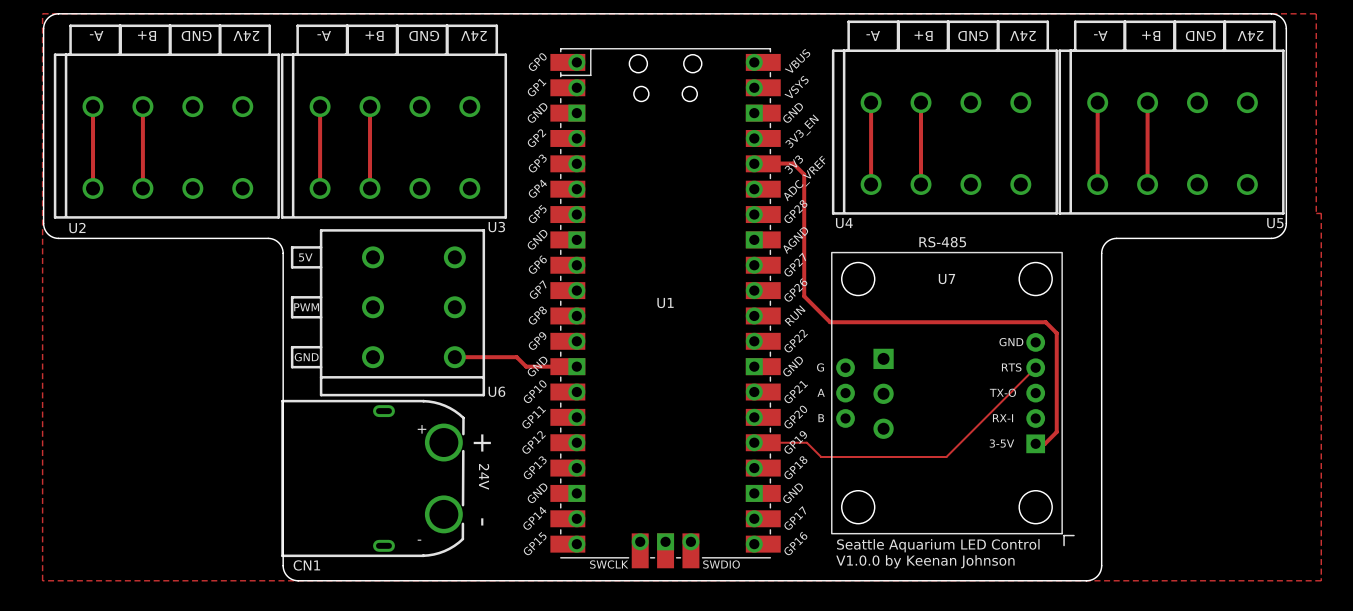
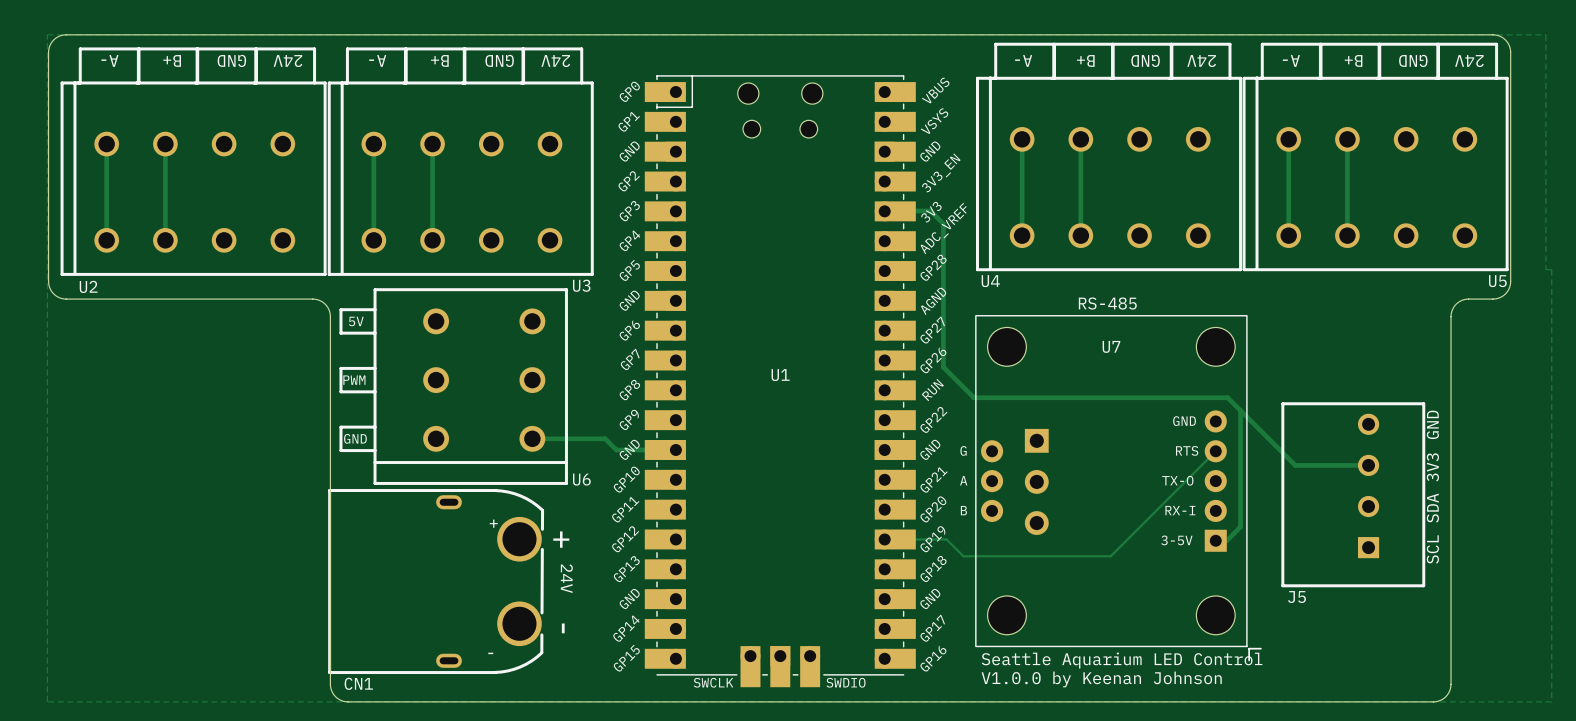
board edge: (1250, 238) (1116, 238) (1107, 241) (1102, 247) (1101, 565) (1097, 576) (1086, 580) -> (1468, 299) (1456, 304) (1451, 316) (1449, 691) (1442, 699) (1433, 701) (1275, 701)
track: none -> (1240, 410) (1295, 465) (1368, 465)
text: none -> GND (1432, 424)
text: none -> 3V3 (1432, 467)
J5: none -> (1353, 494)
text: none -> SDA (1432, 508)
text: none -> SCL (1432, 549)

